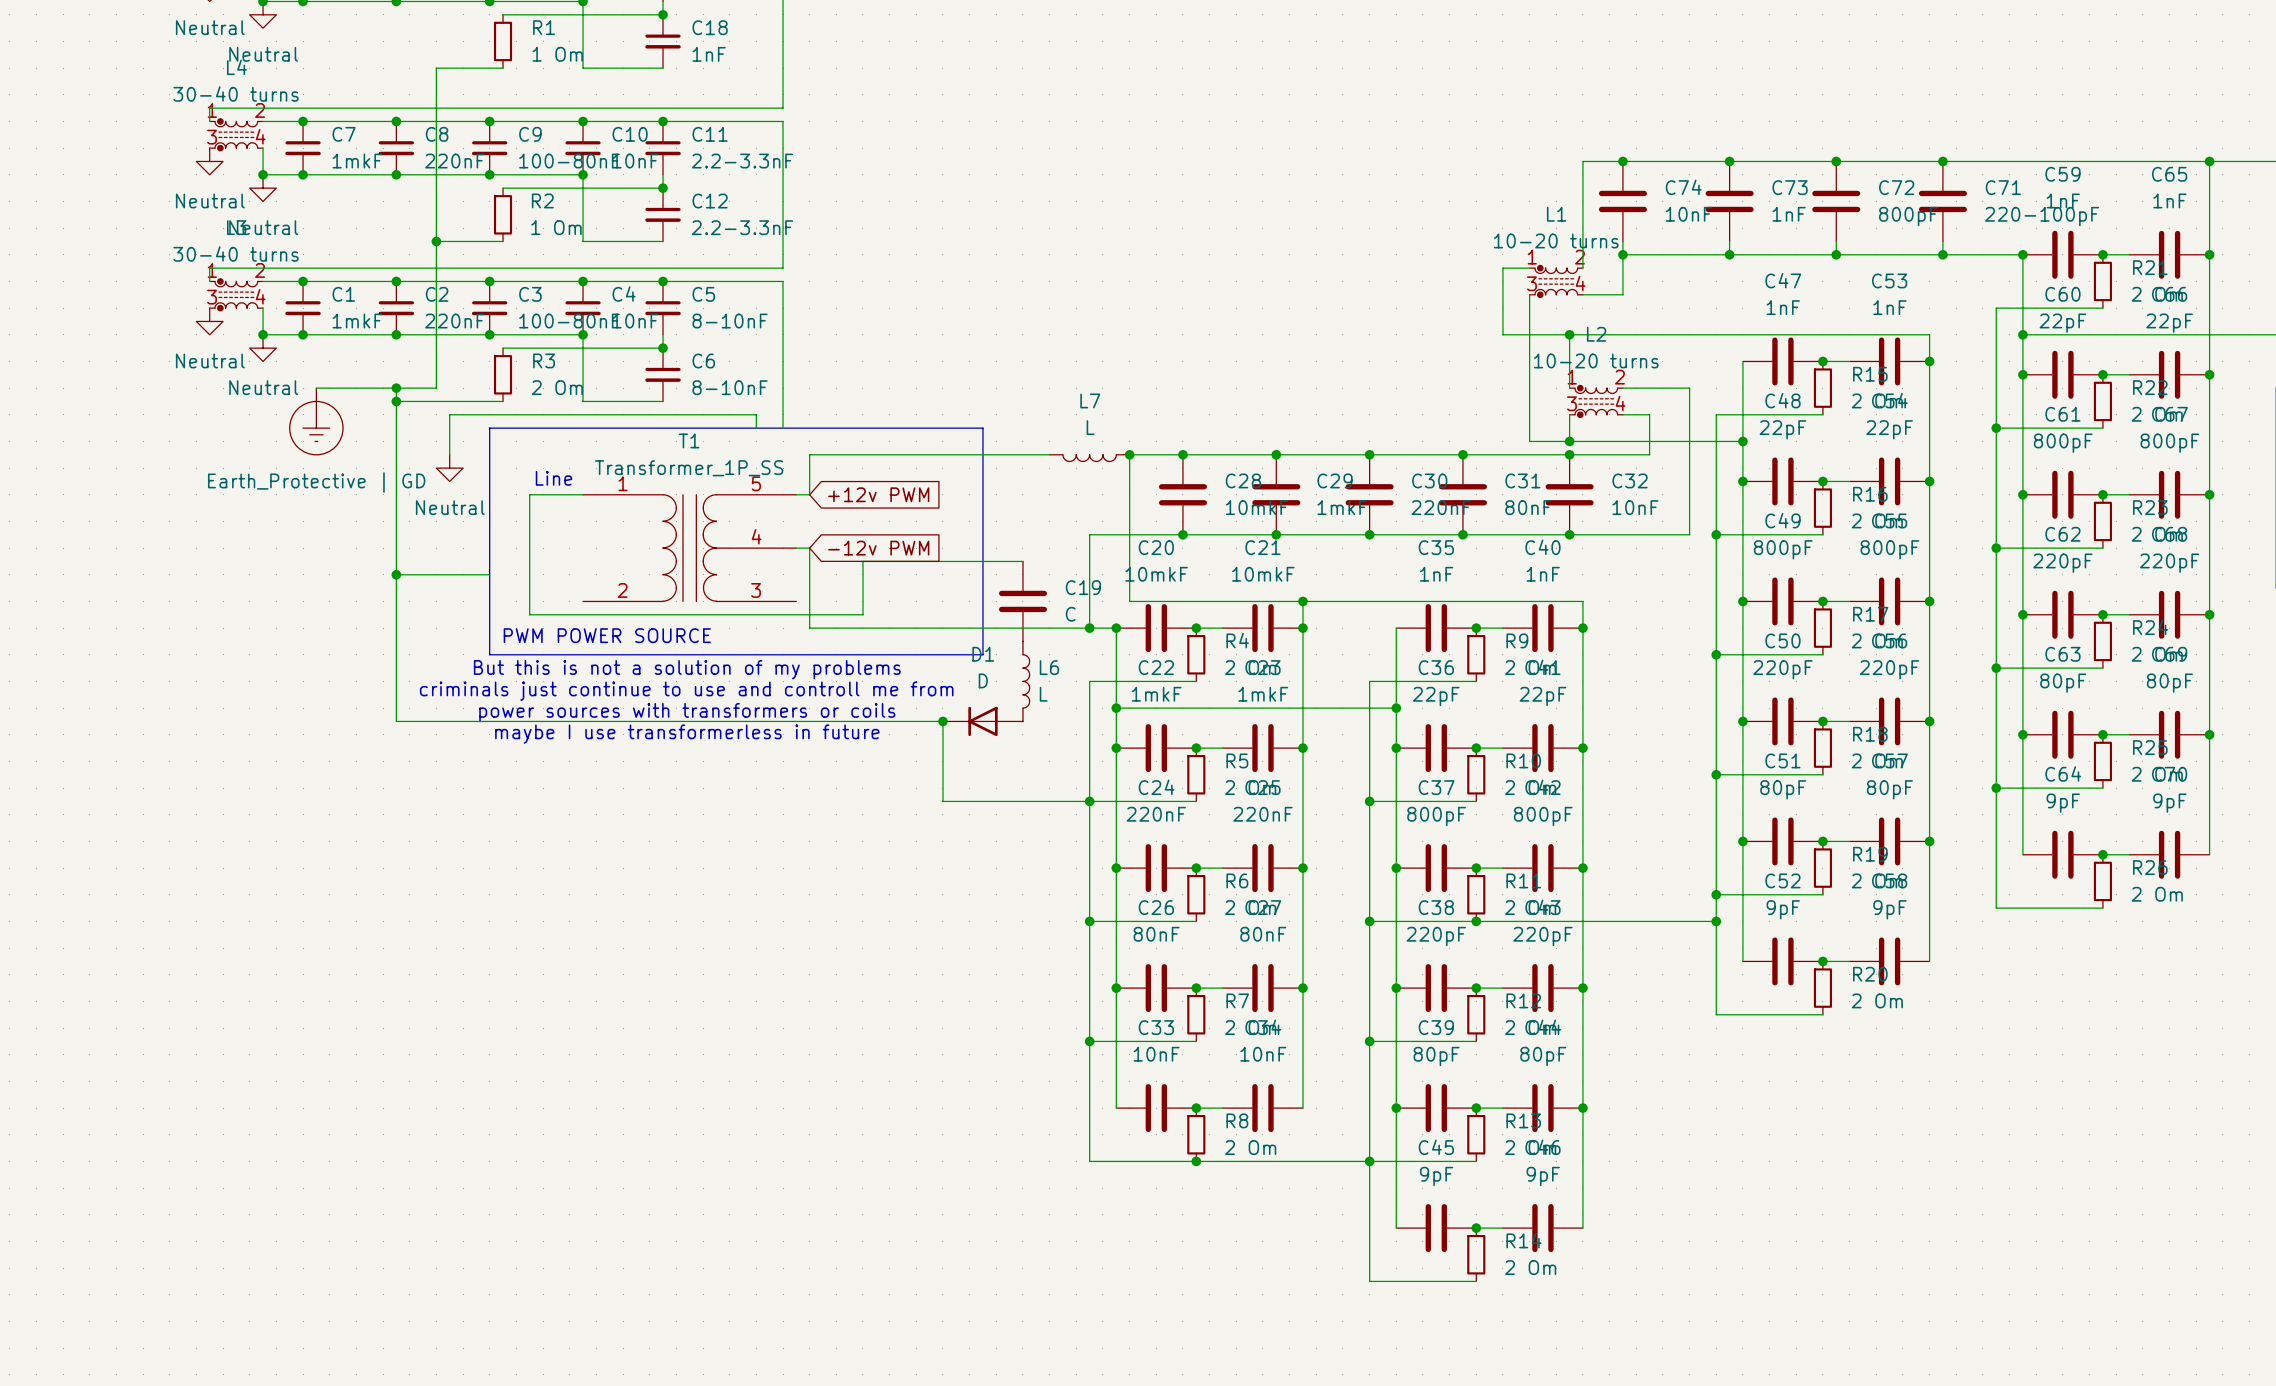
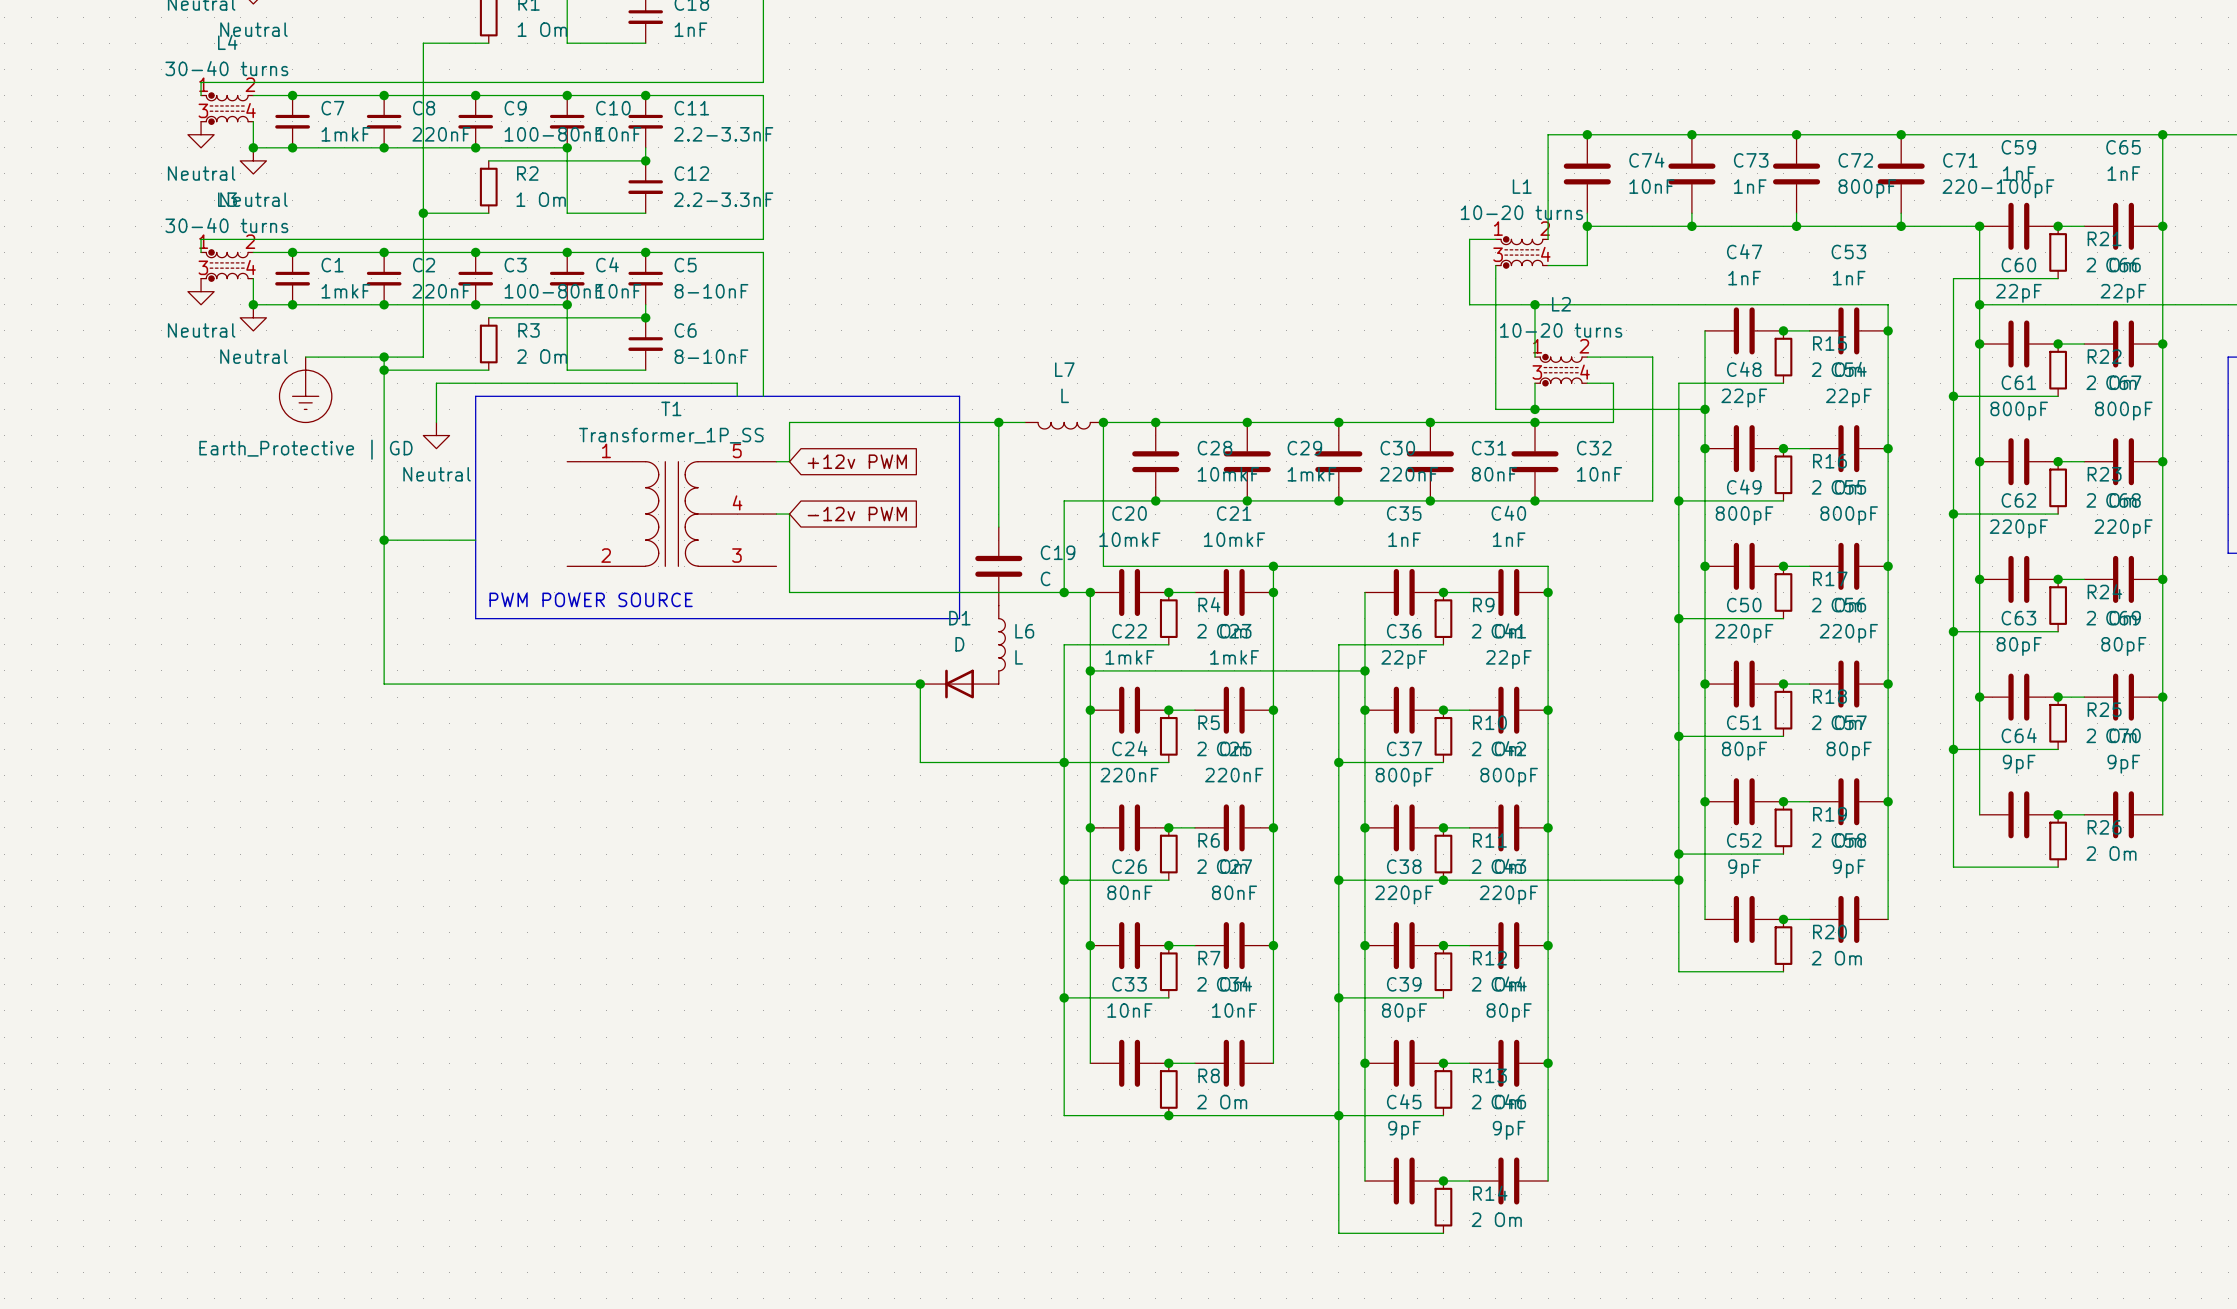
junction: none -> (998, 422)
text: Line (553, 478) -> none
wire: (583, 494) (529, 494) (529, 614) (862, 614) (862, 561) (1022, 561) -> (998, 422) (998, 527)
text: But this is not a solution of my problems (687, 669) -> none
text: criminals just continue to use and controll me from (686, 691) -> none
text: power sources with transformers or coils (687, 712) -> none
text: maybe I use transformerless in future (687, 734) -> none

